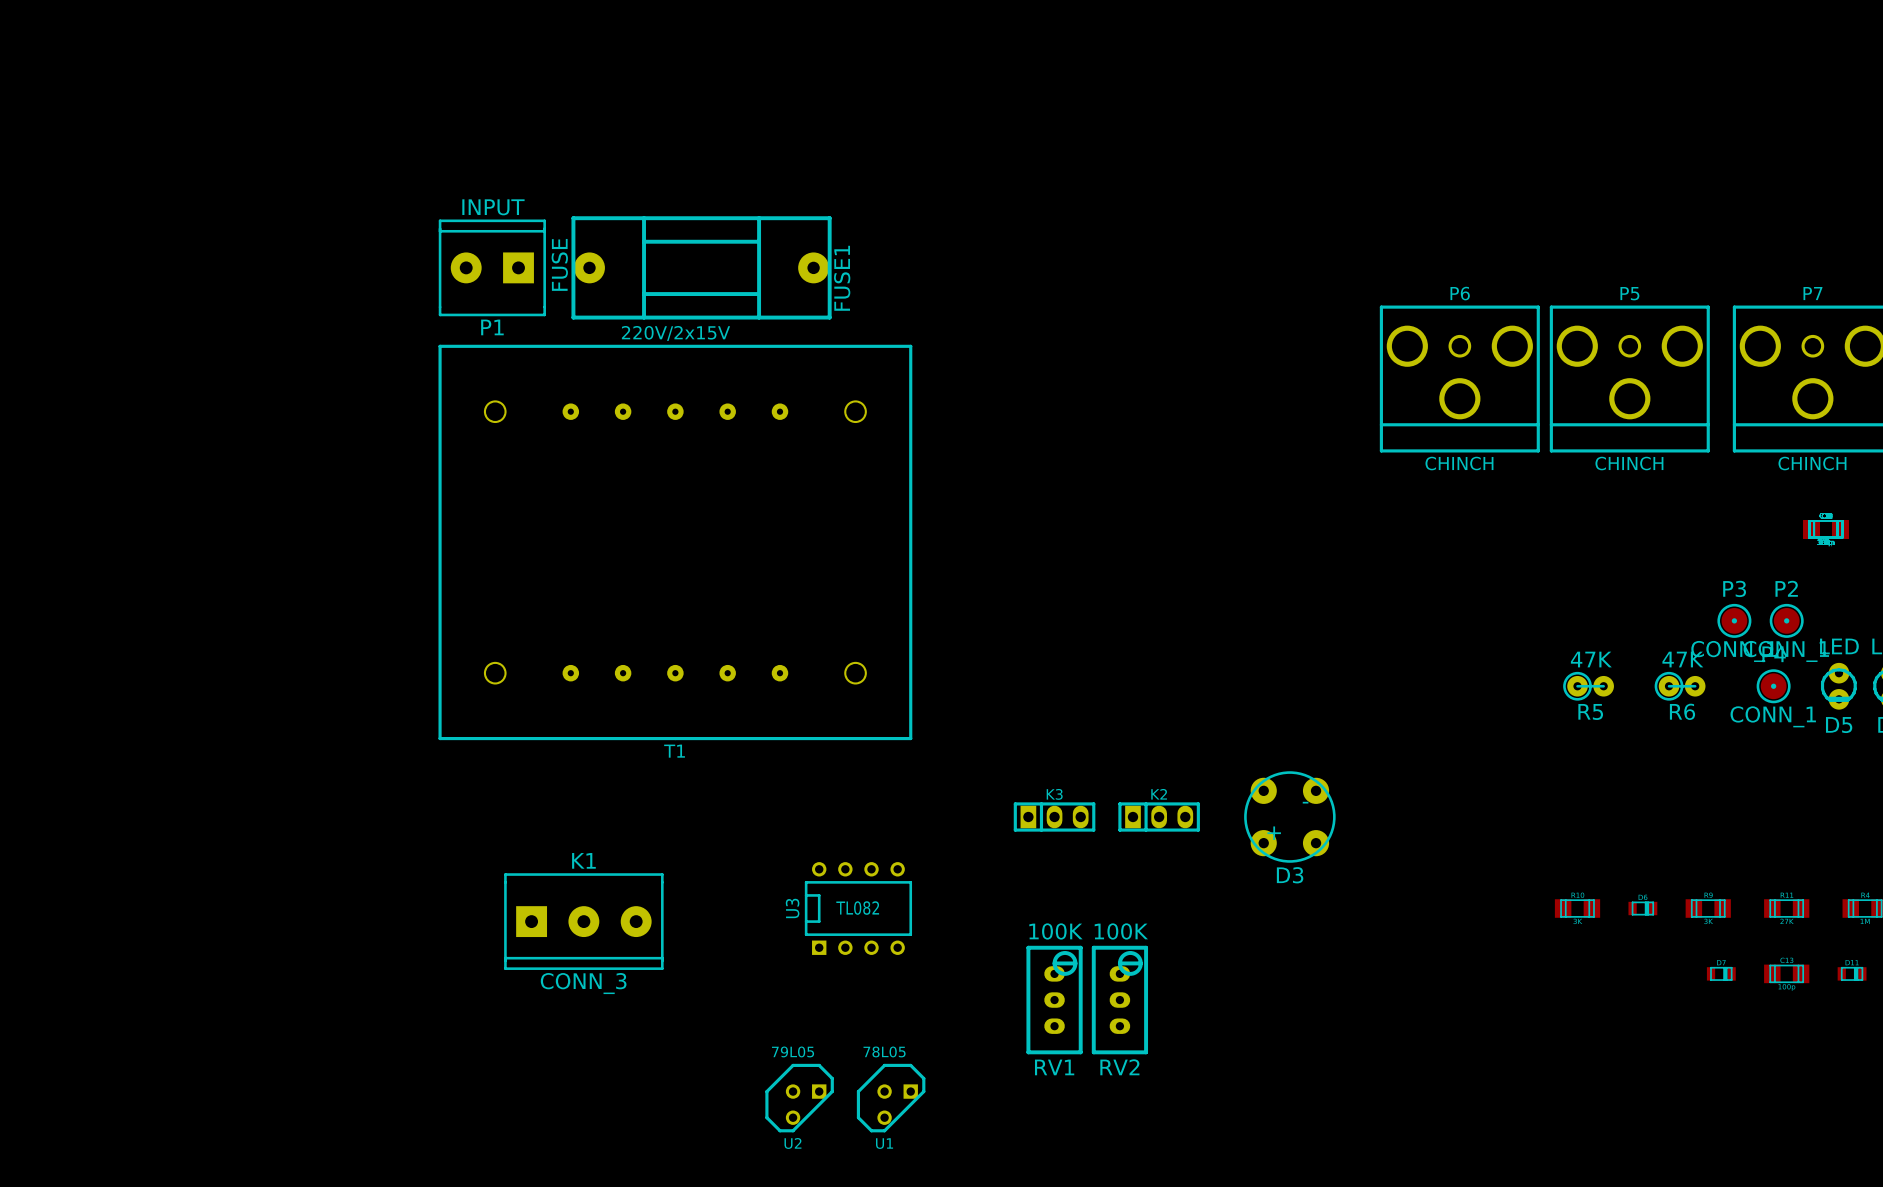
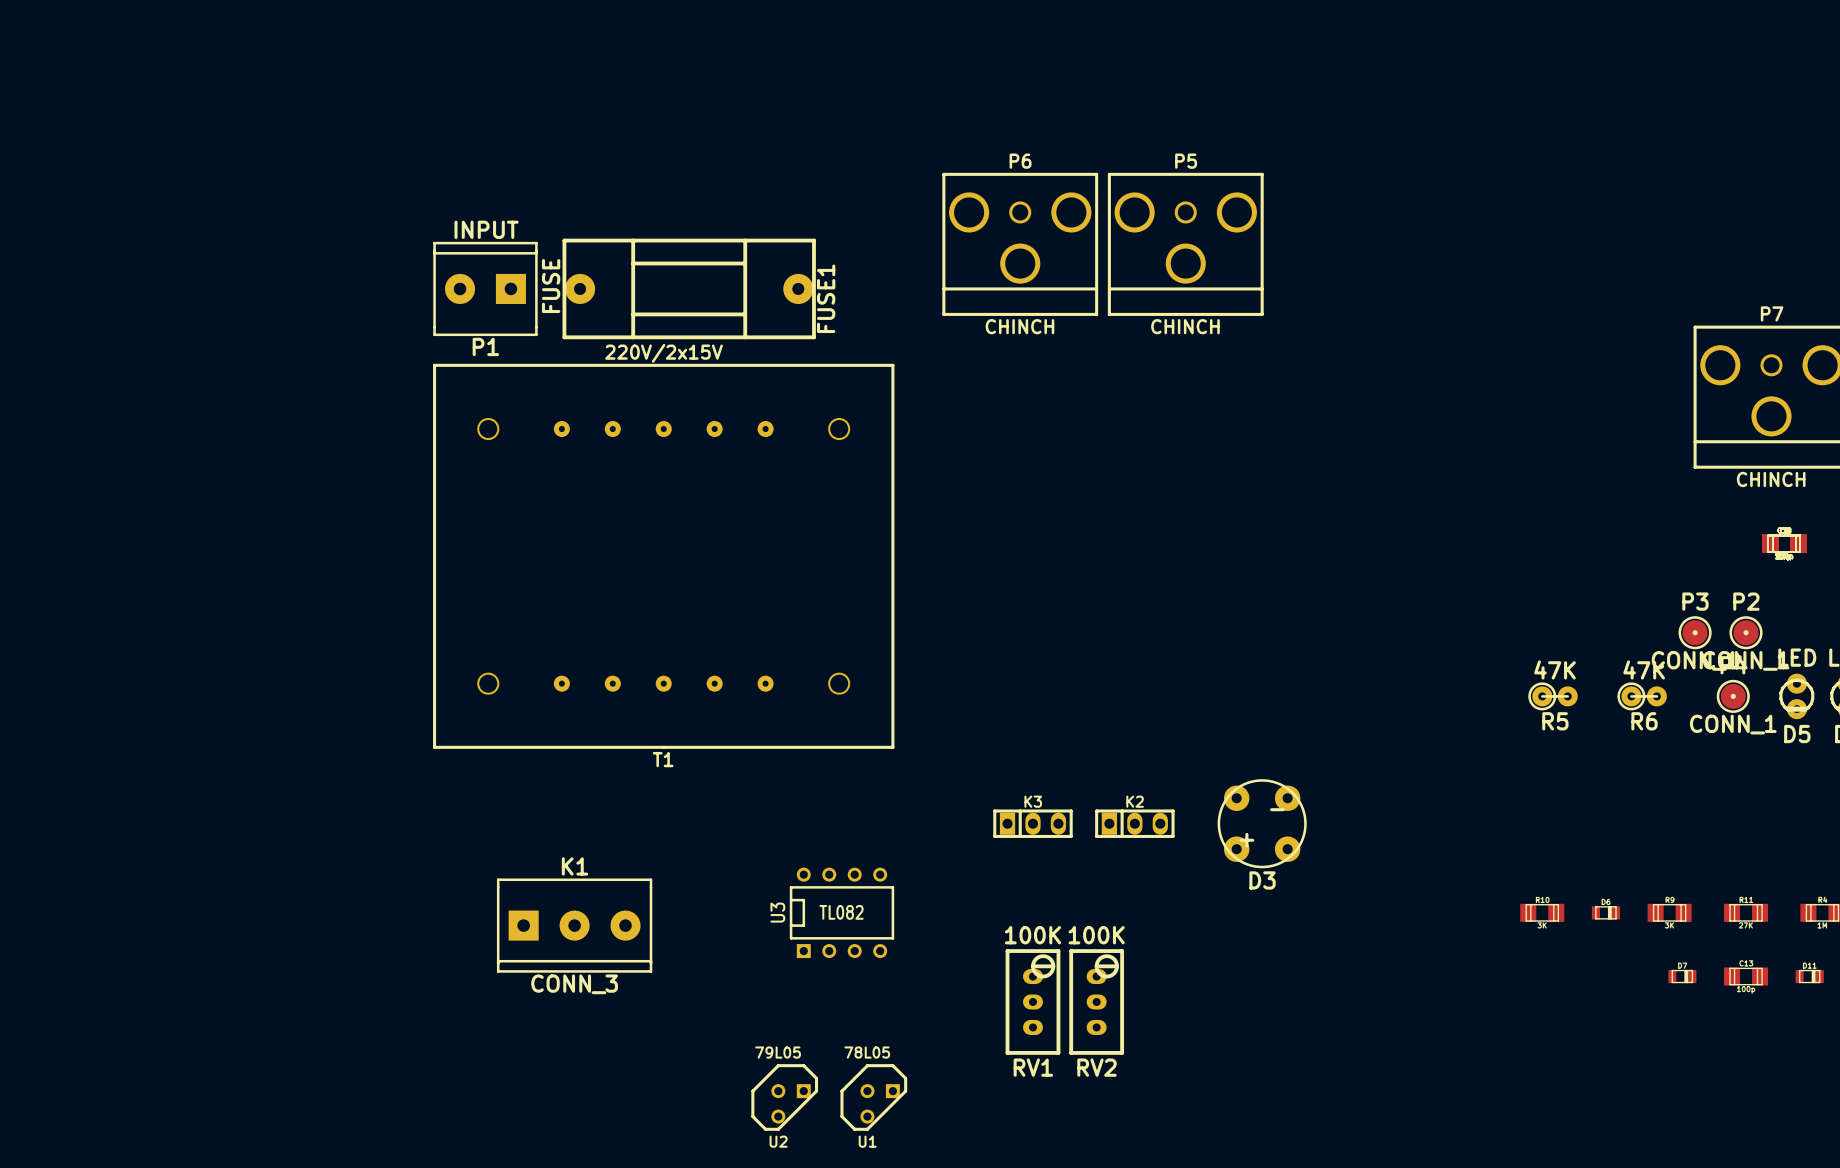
P6 position: (1459, 379) -> (1020, 244)
P5 position: (1629, 379) -> (1185, 244)

